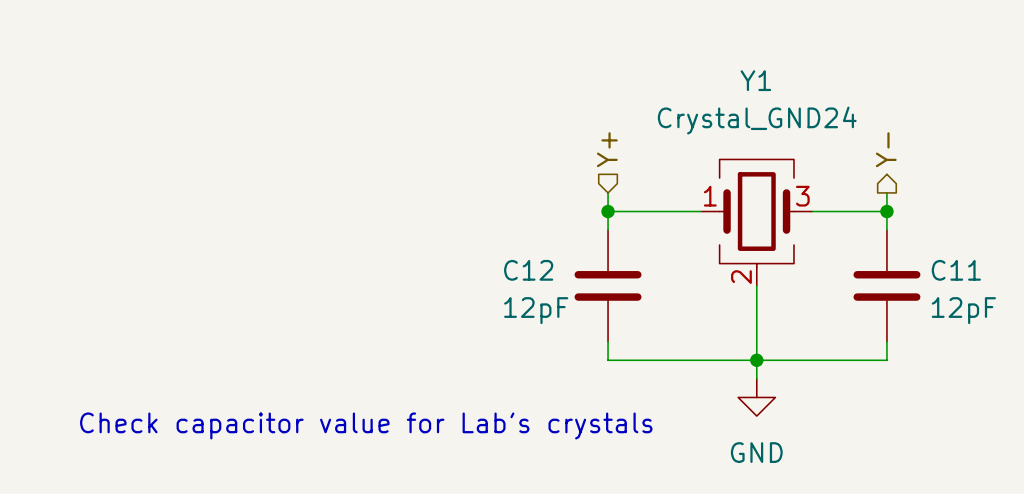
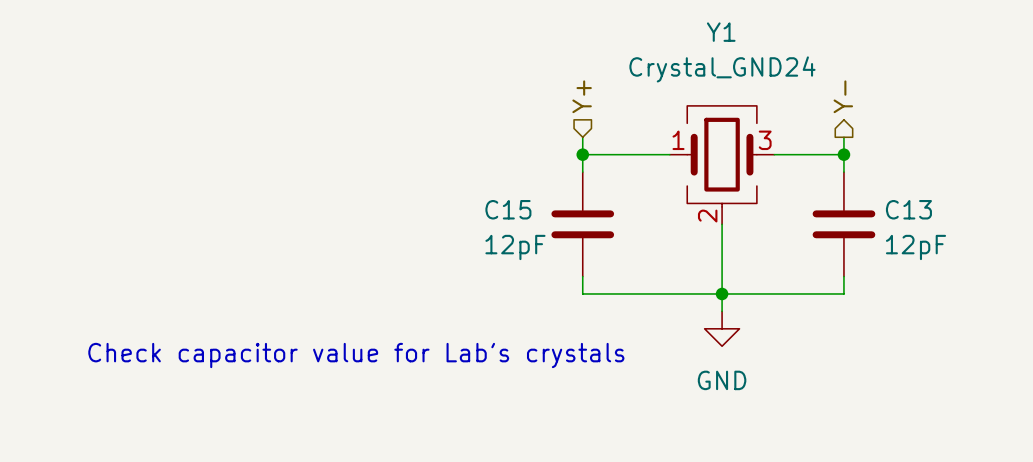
C12 name: C12 (528, 270) -> C15 (508, 209)
C11 name: C11 (956, 270) -> C13 (908, 209)

